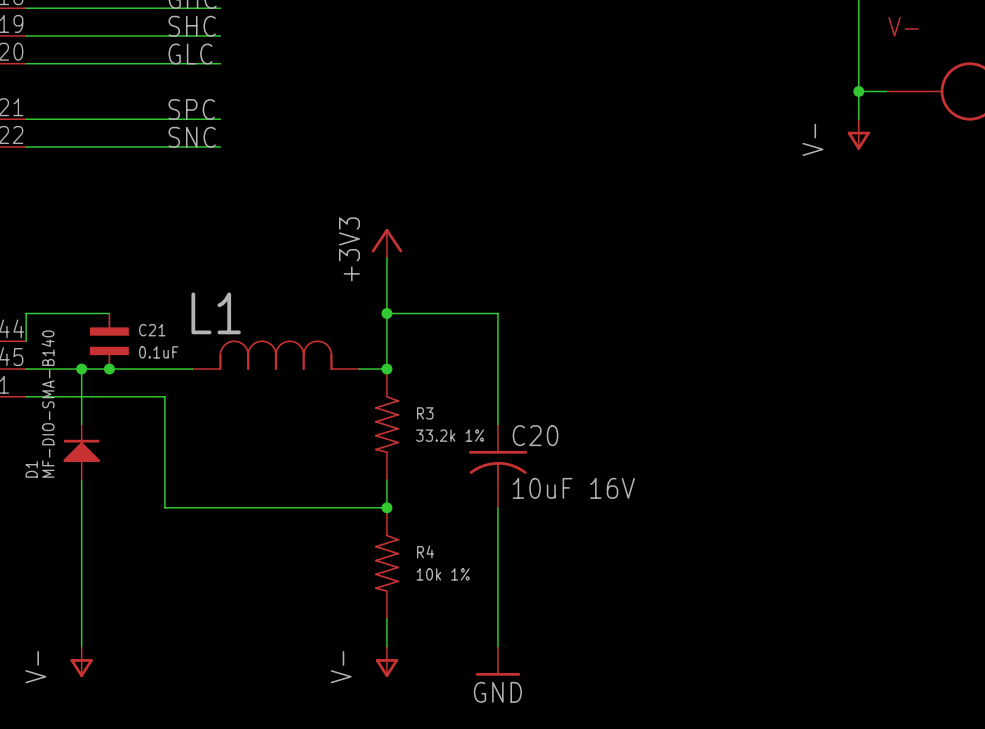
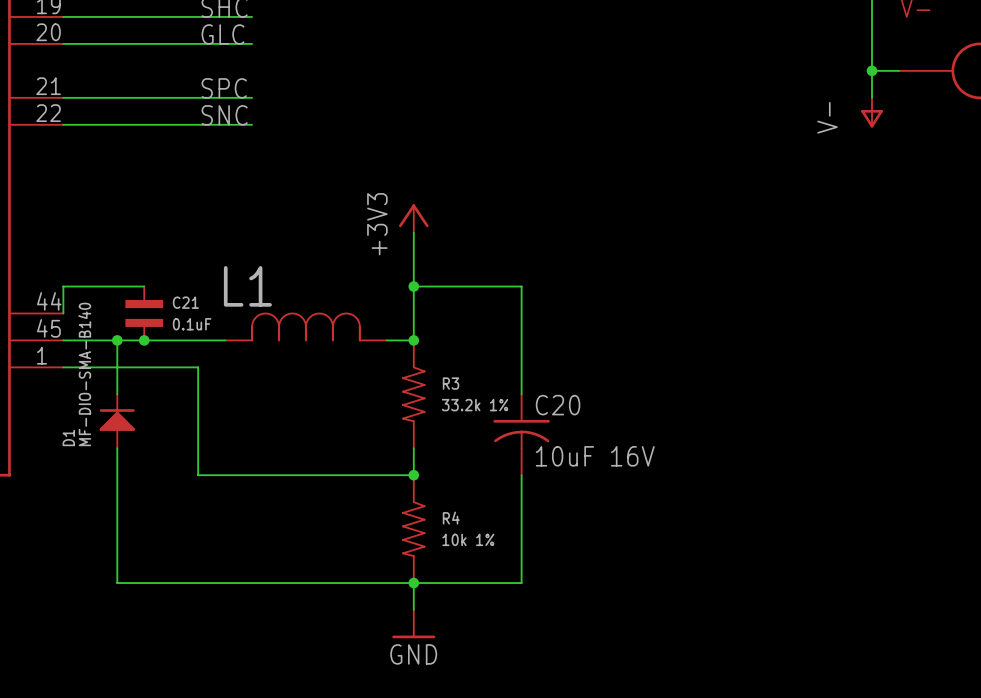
wire: (81, 618) (81, 646) -> (117, 583) (521, 583)
junction: none -> (413, 583)
wire: (497, 618) (497, 646) -> none
power symbol: V- (81, 661) -> none
power symbol: V- (386, 661) -> GND (413, 624)
power symbol: GND (497, 661) -> none

